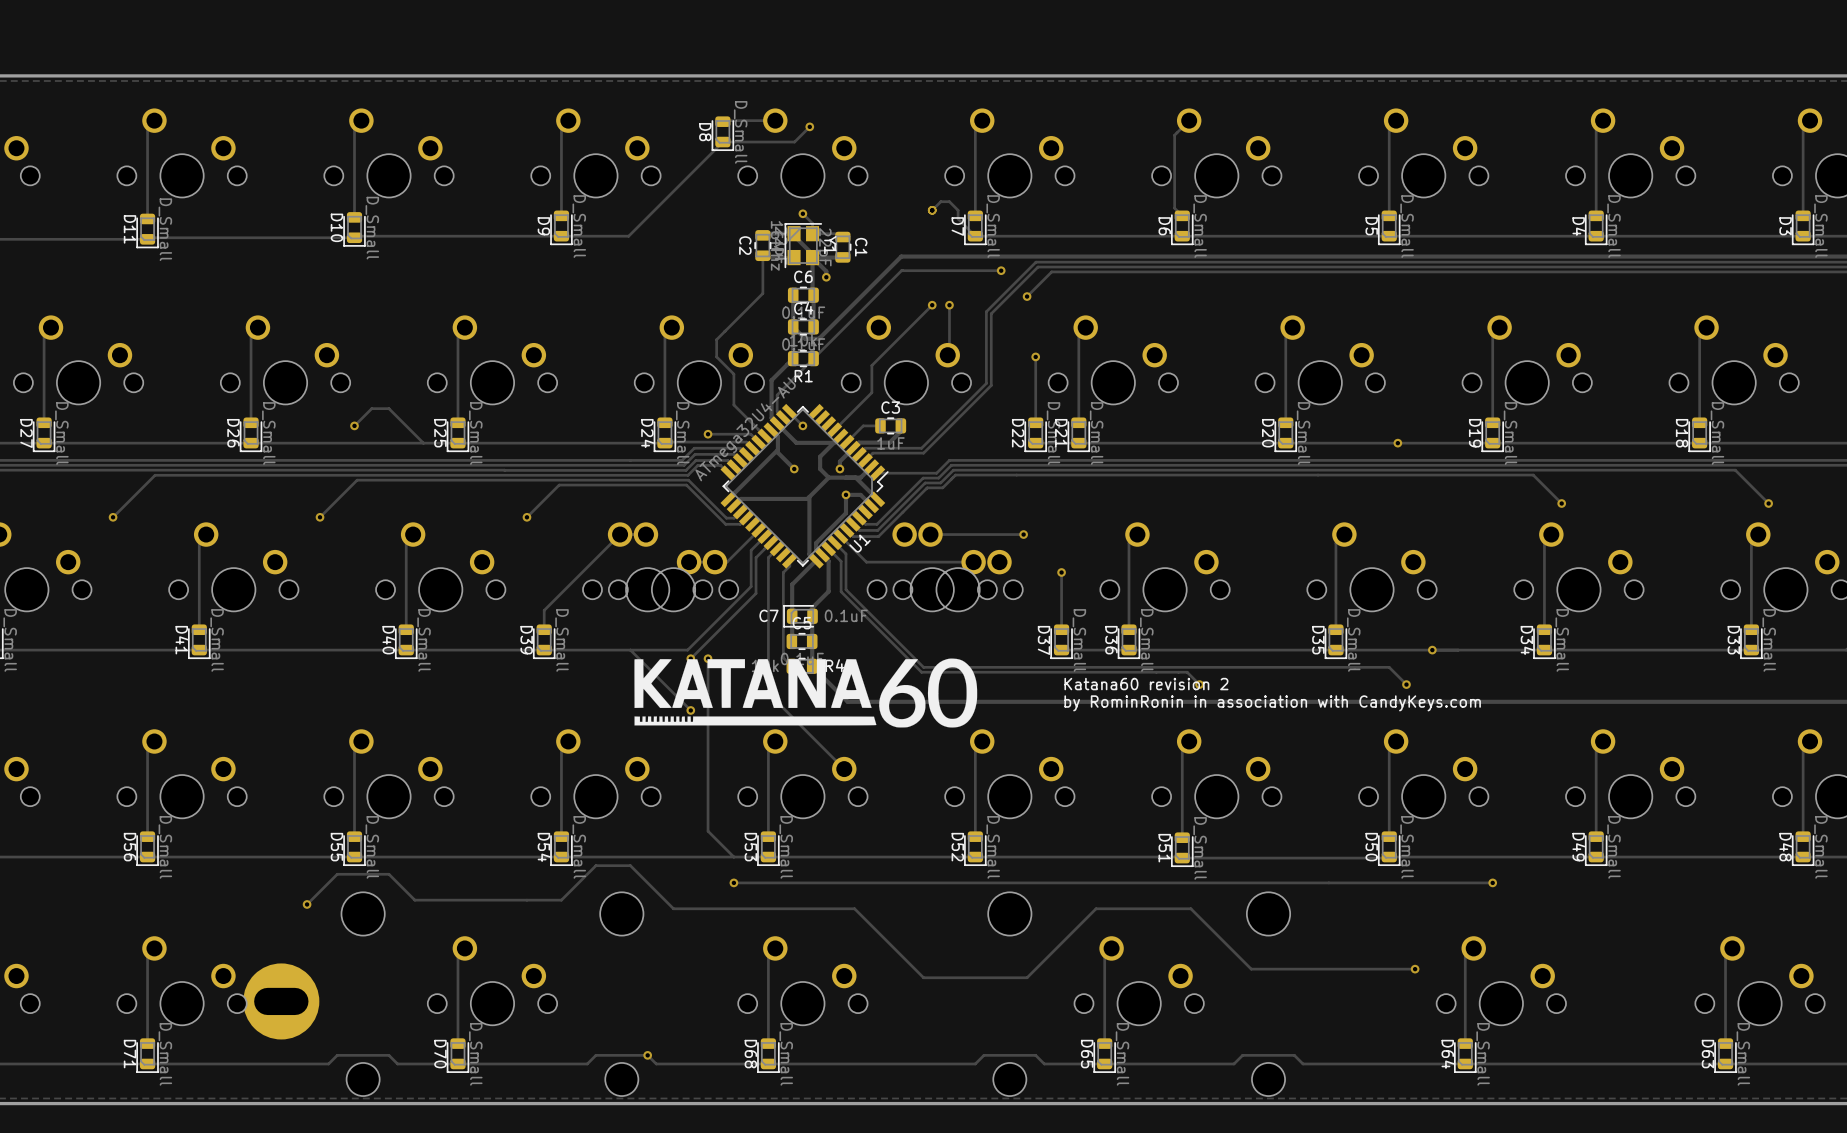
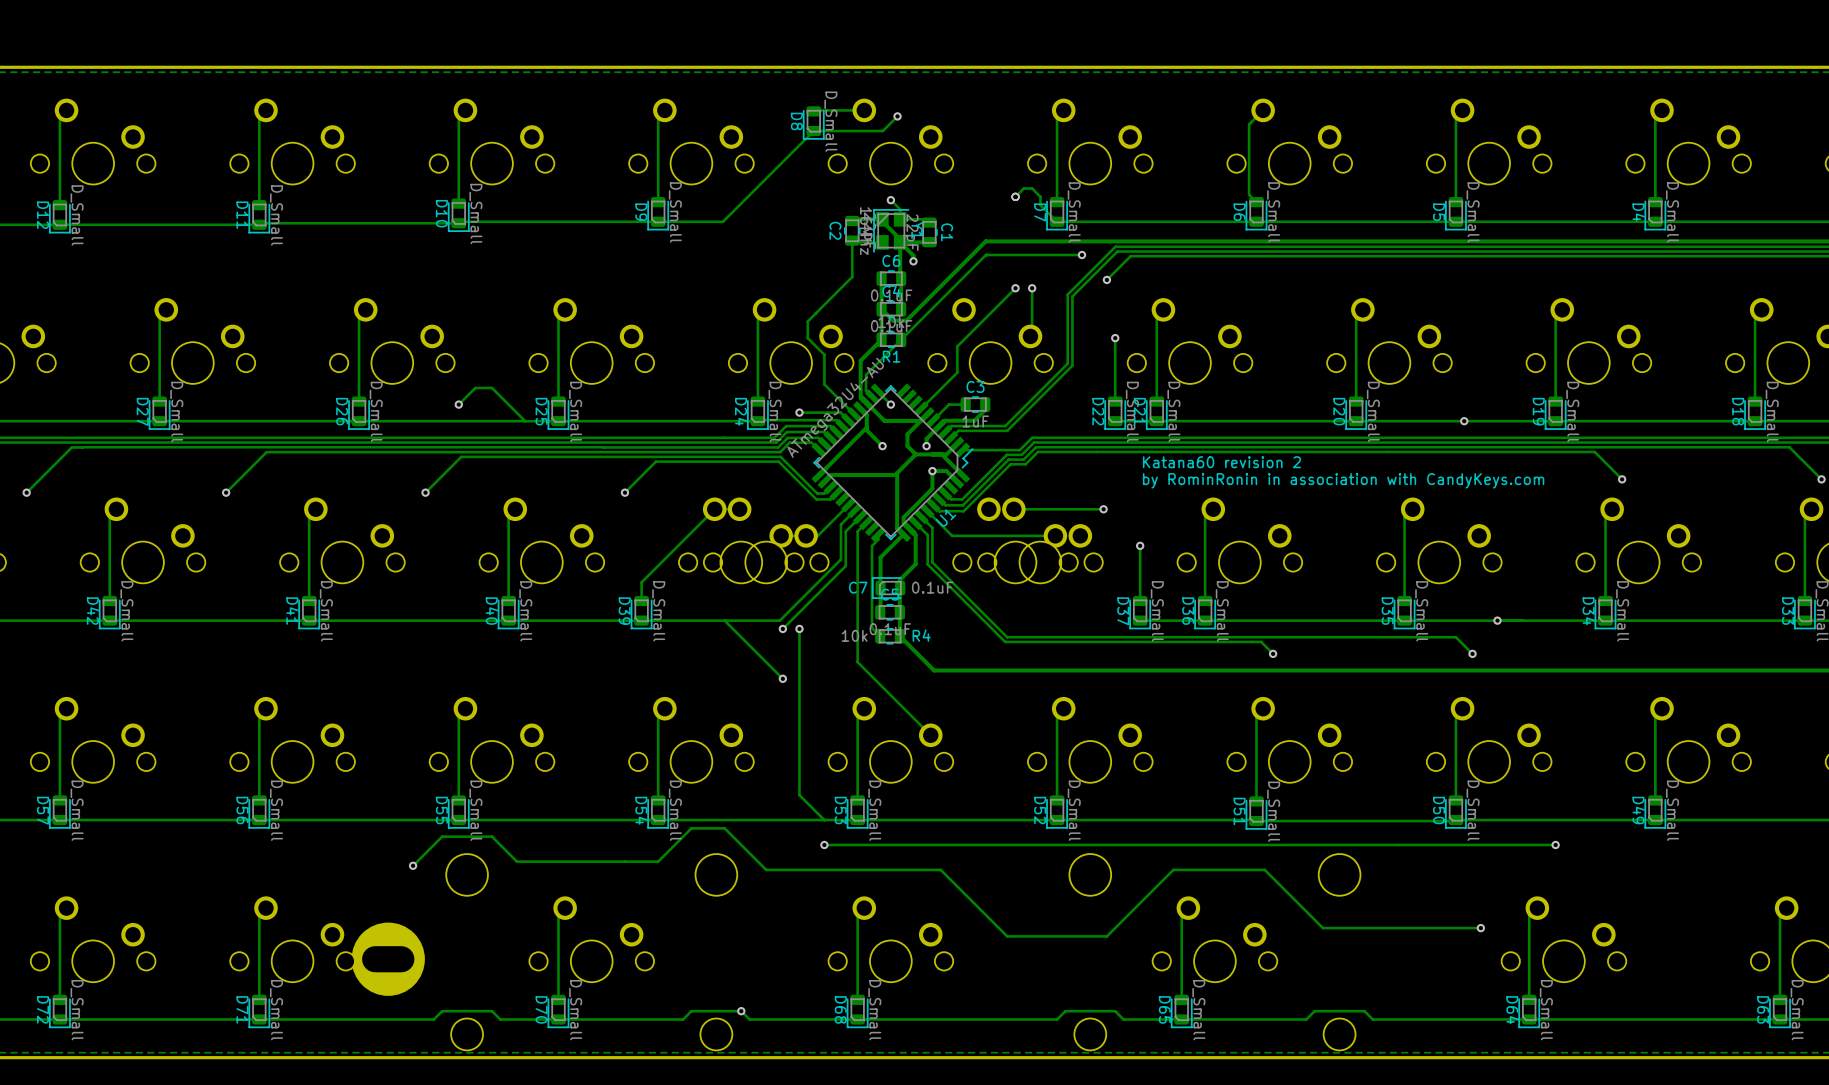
drawing: [634, 658, 978, 728] -> none
text position: Katana60 revision 2 (1146, 684) -> Katana60 revision 2 (1221, 462)
text position: by RominRonin in association with CandyKeys.com (1272, 703) -> by RominRonin in association with CandyKeys.com (1343, 480)

